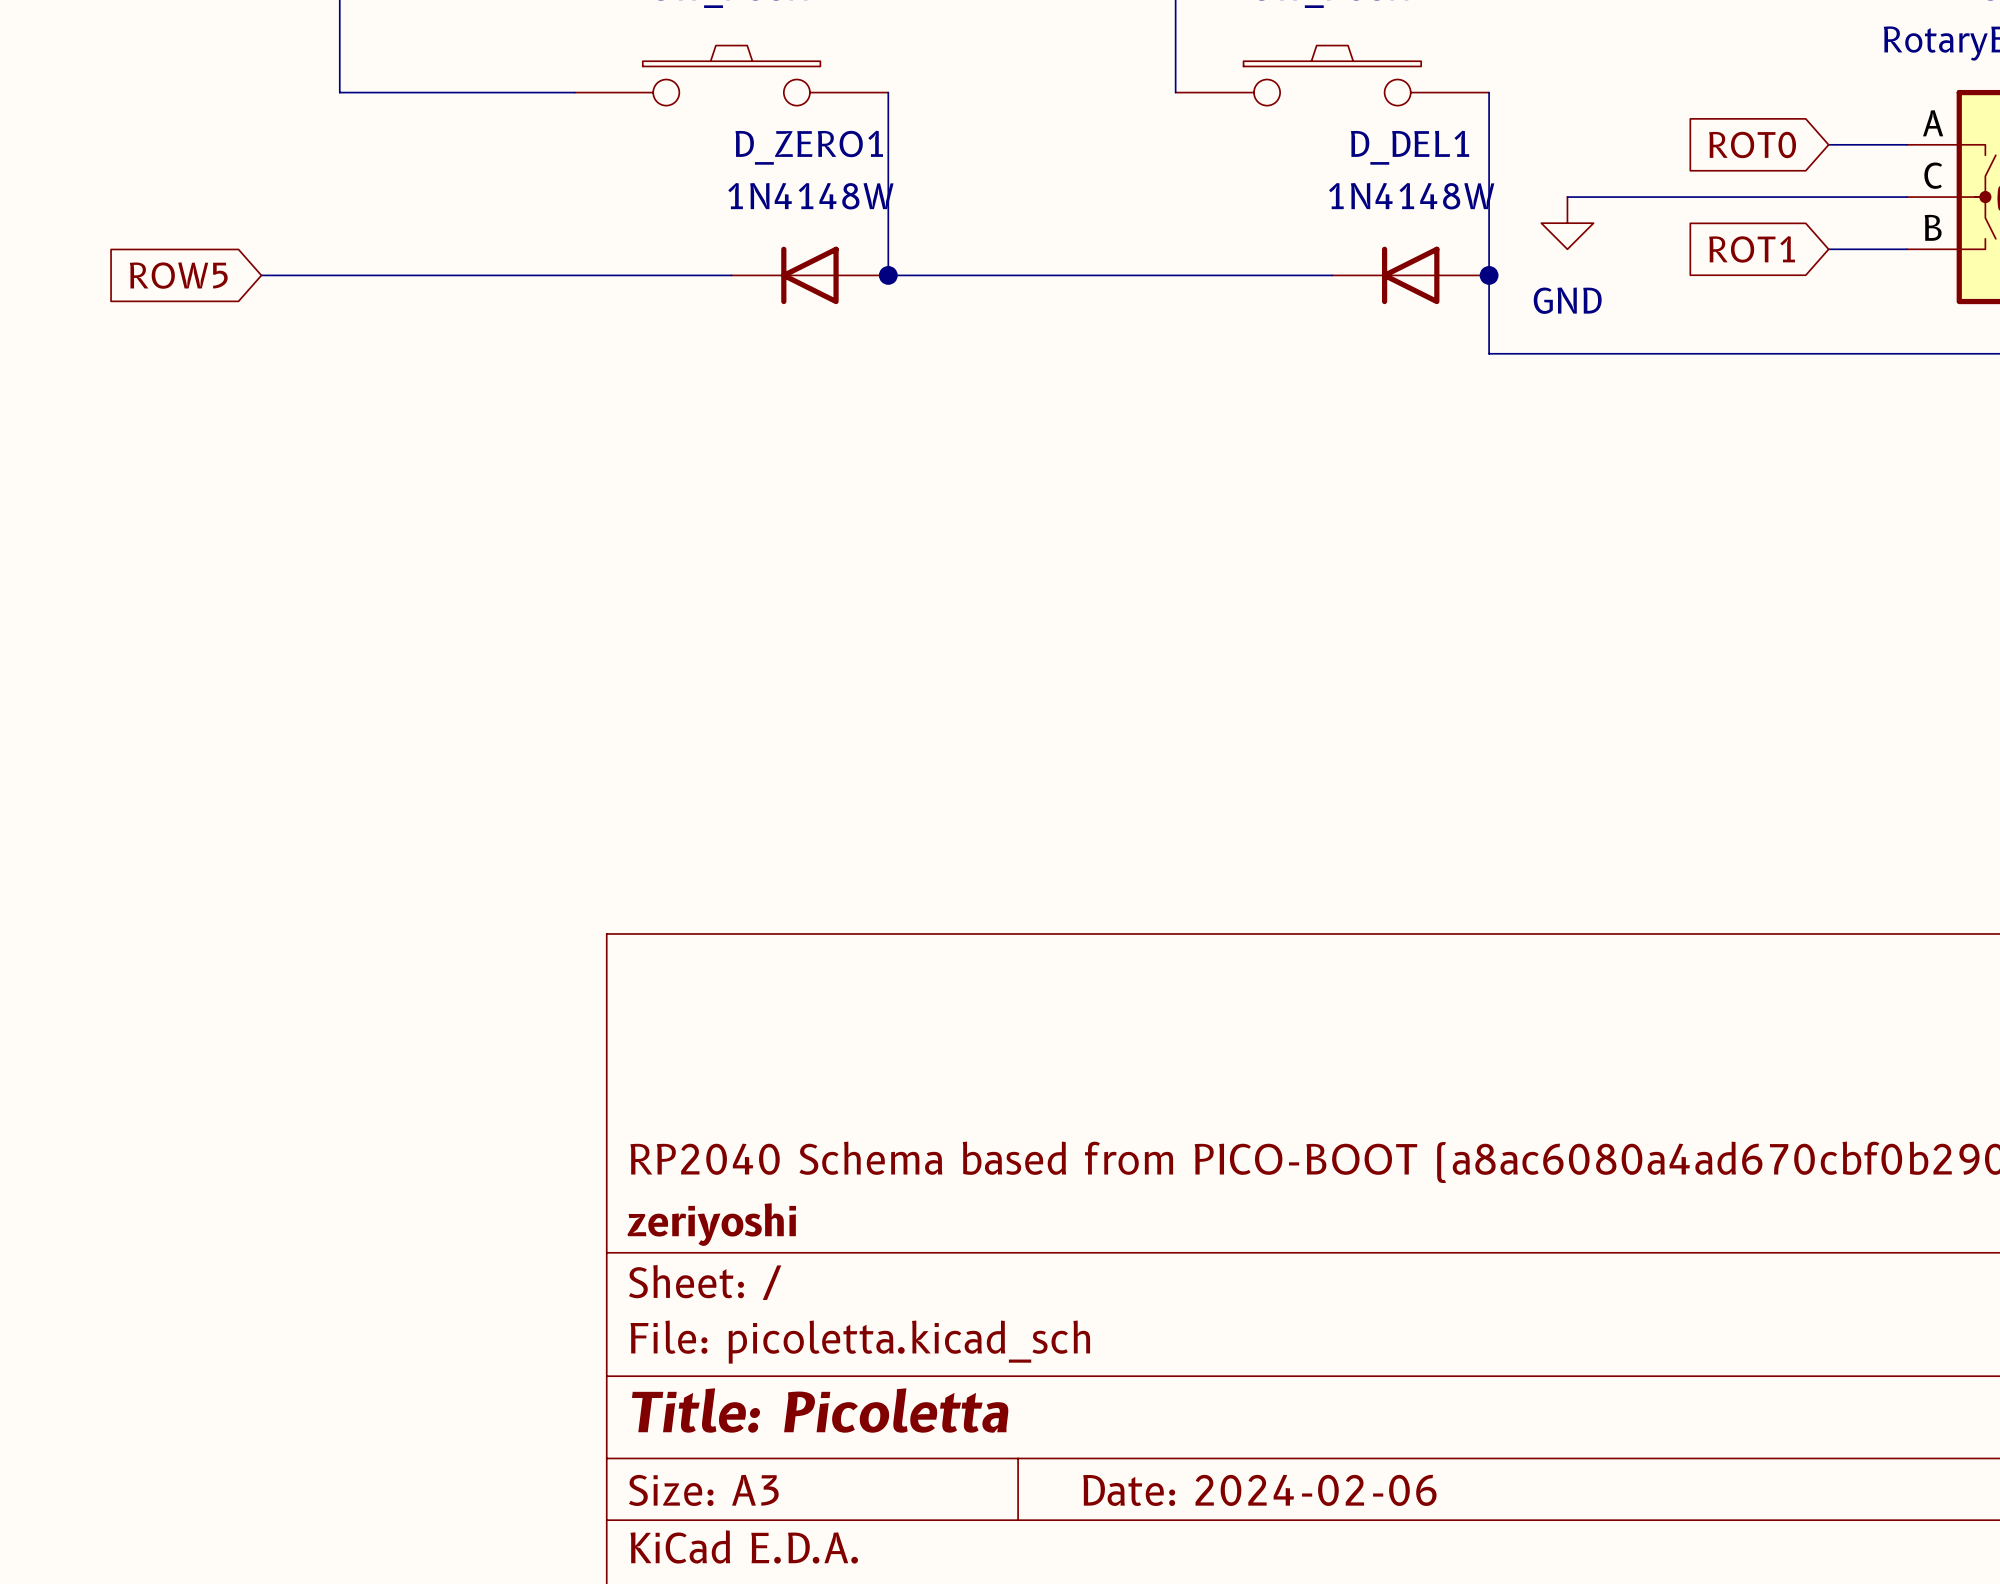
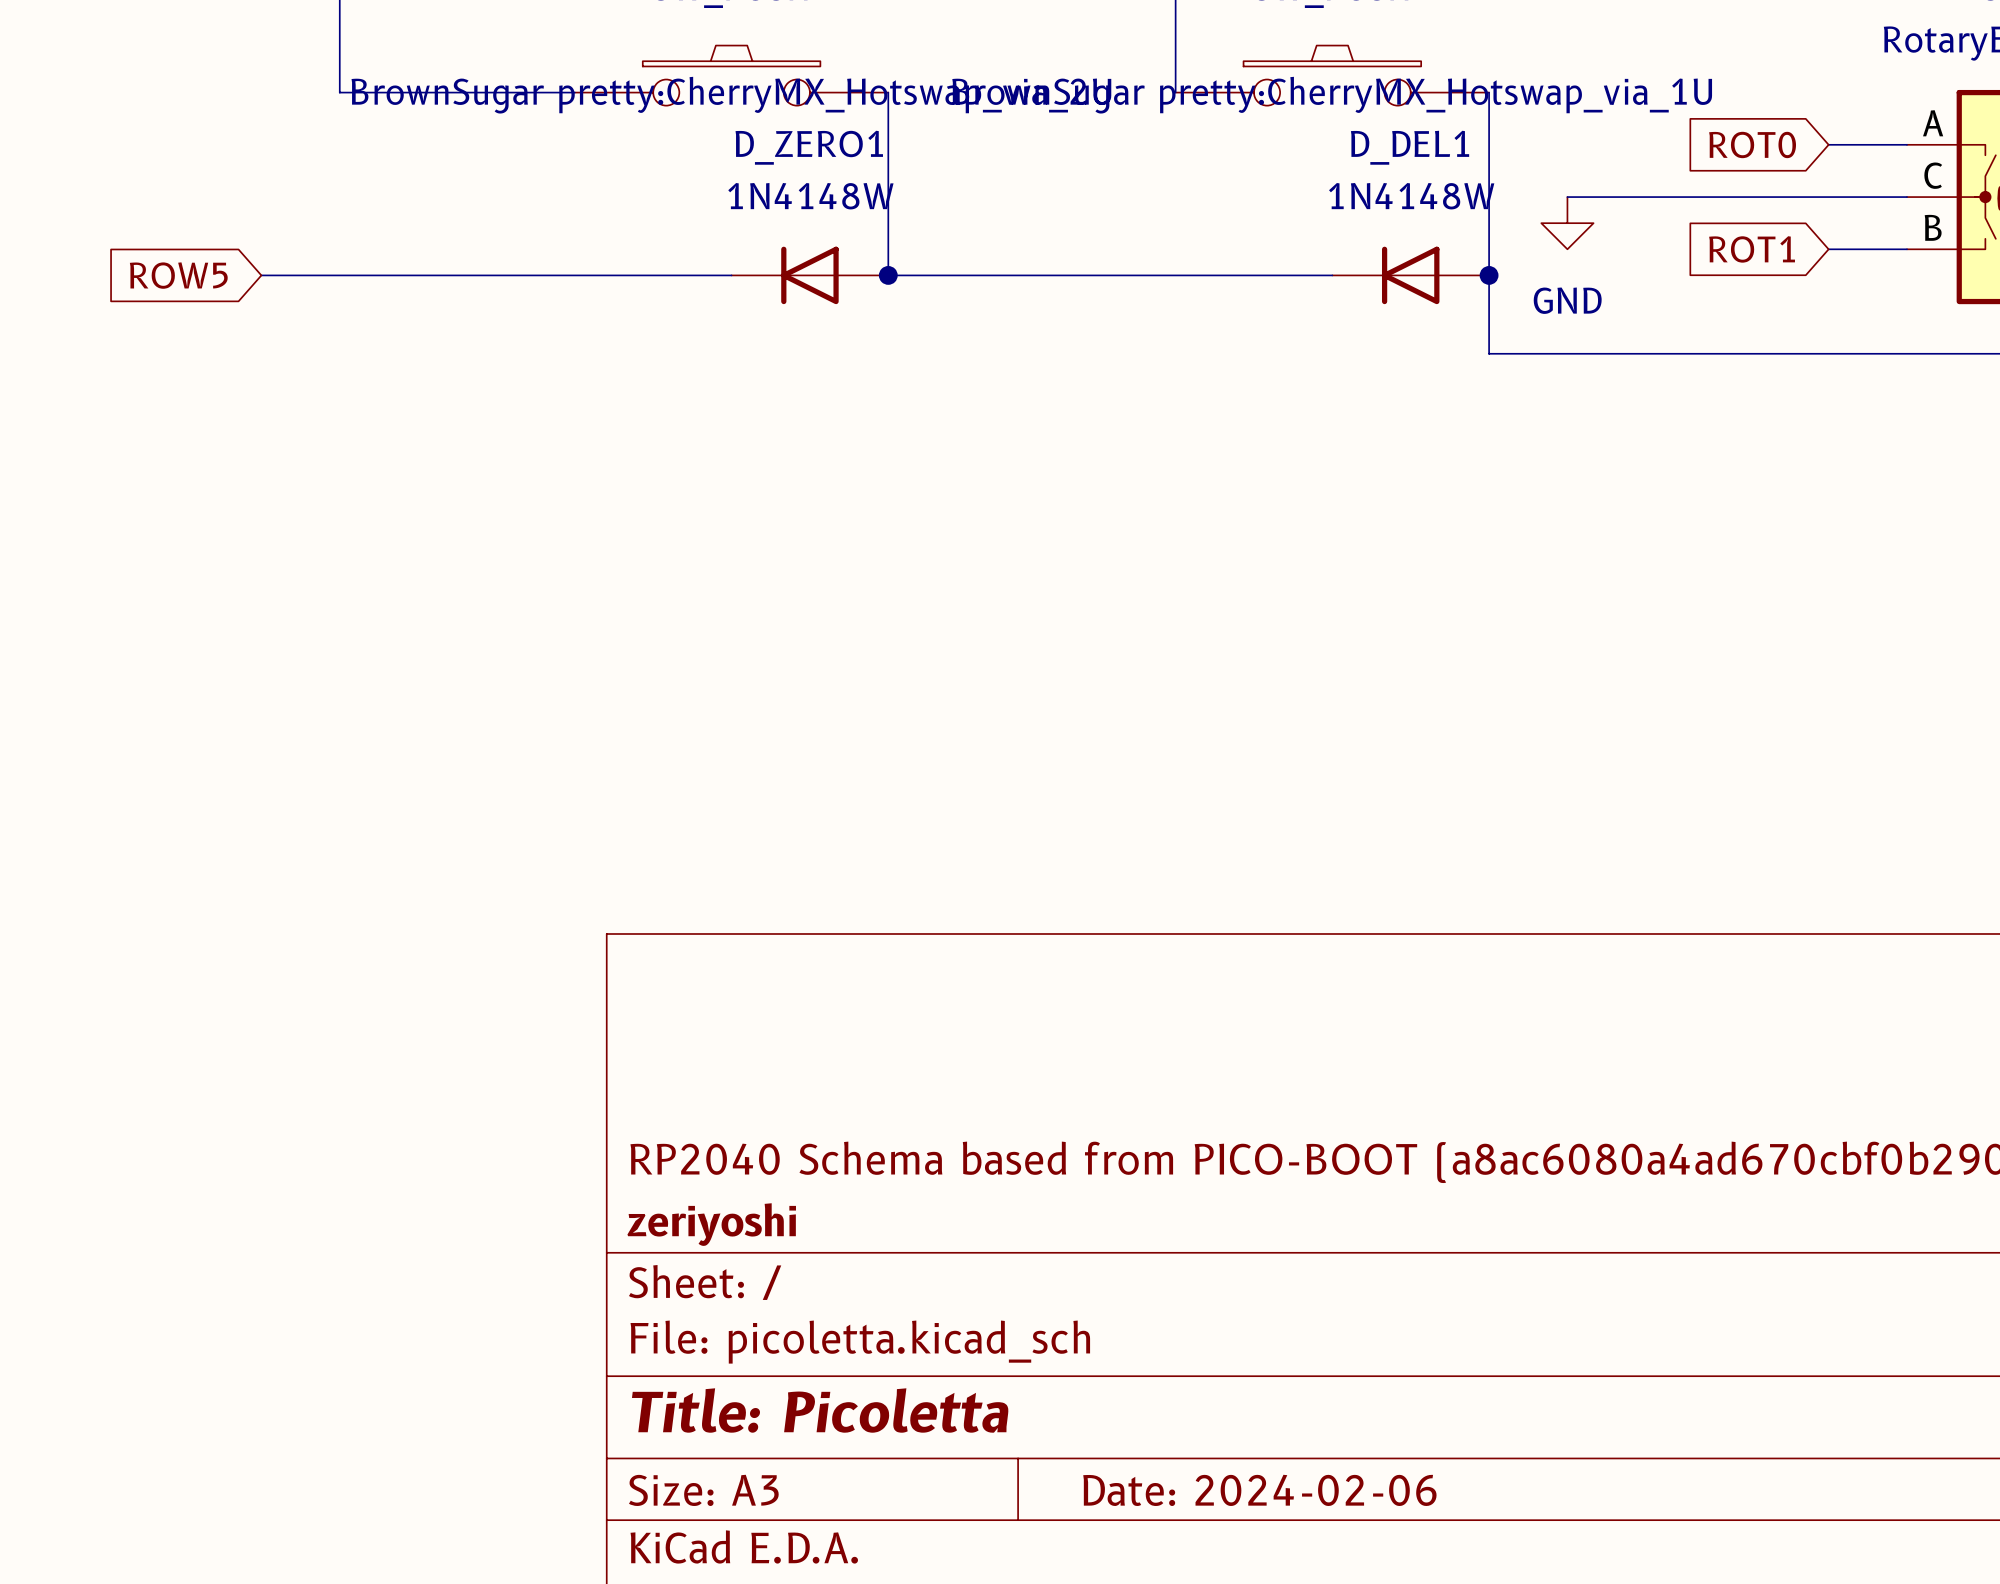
part text: none -> BrownSugar pretty:CherryMX_Hotswap_via_2U (731, 95)
part text: none -> BrownSugar pretty:CherryMX_Hotswap_via_1U (1332, 95)

